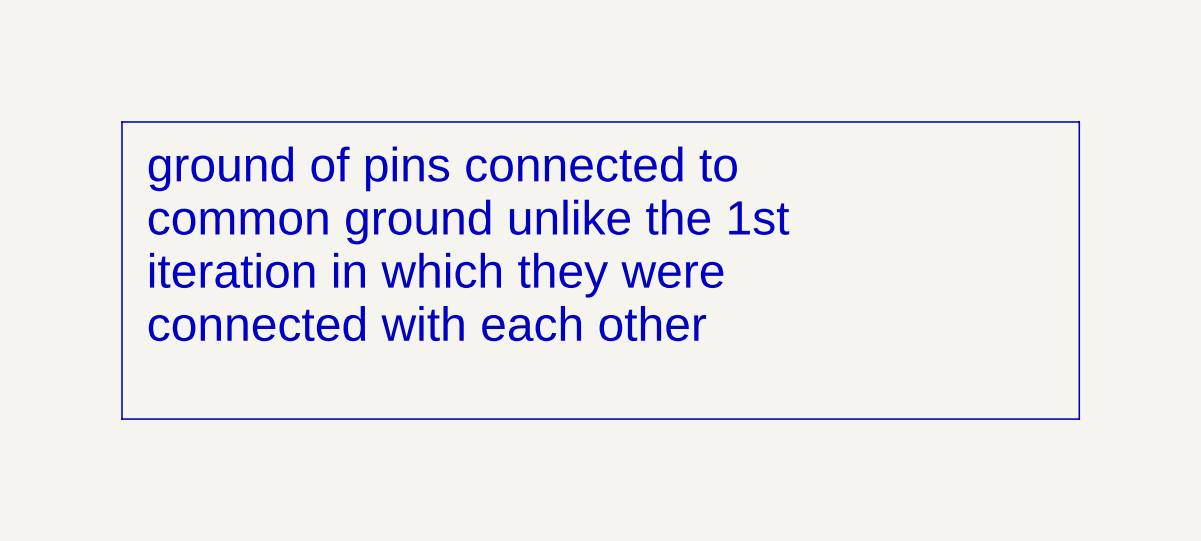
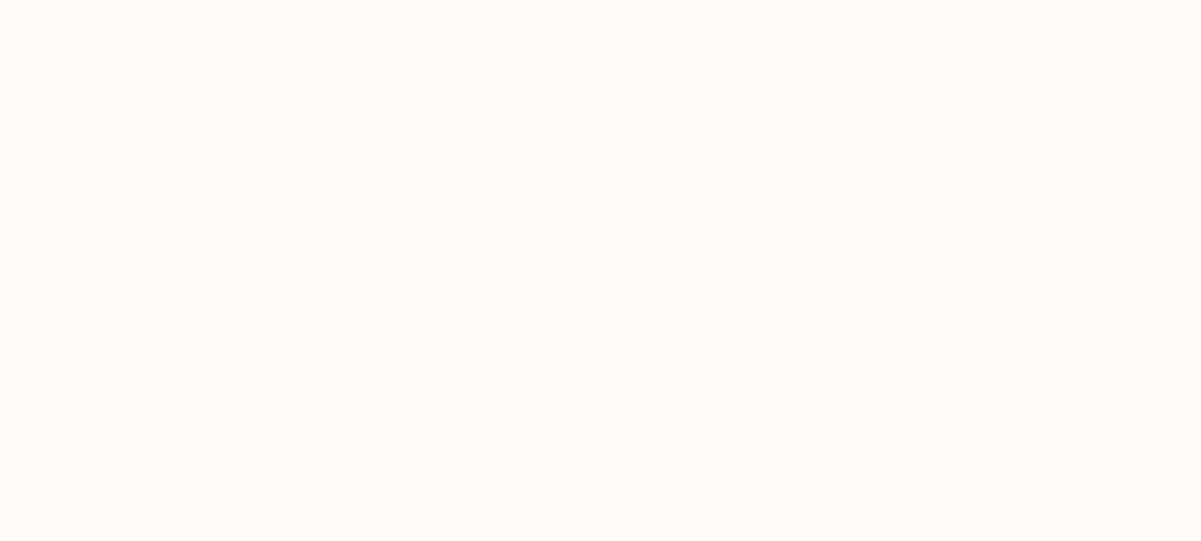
line: (121, 121) (1079, 121) (1079, 419) (121, 419) (121, 121) -> none
text: ground of pins connected to (442, 168) -> none
text: common ground unlike the 1st (468, 222) -> none
text: iteration in which they were (436, 275) -> none
text: connected with each other (427, 323) -> none

